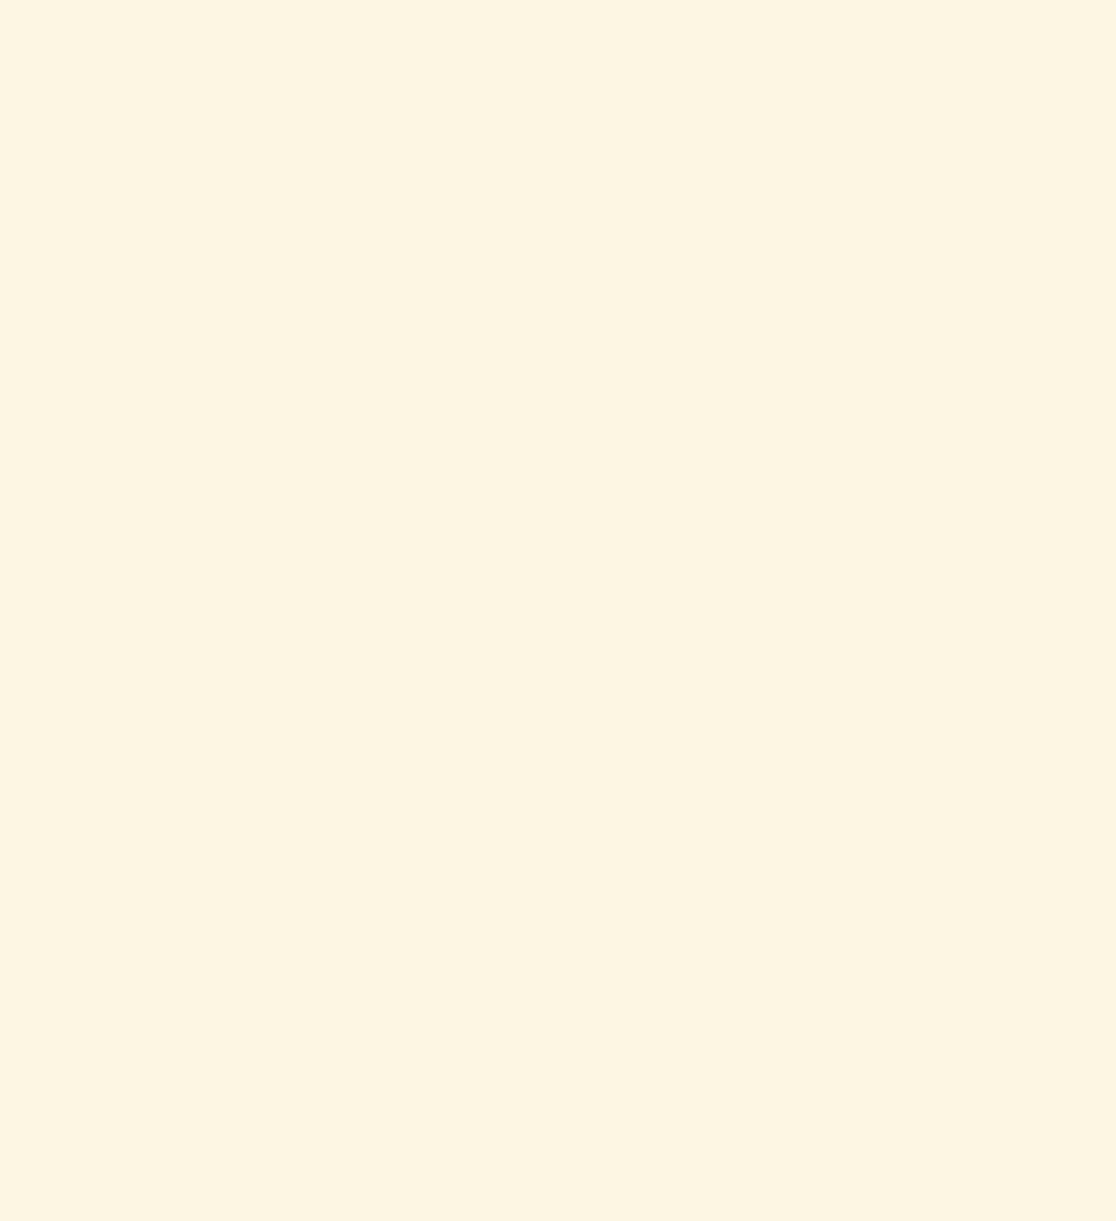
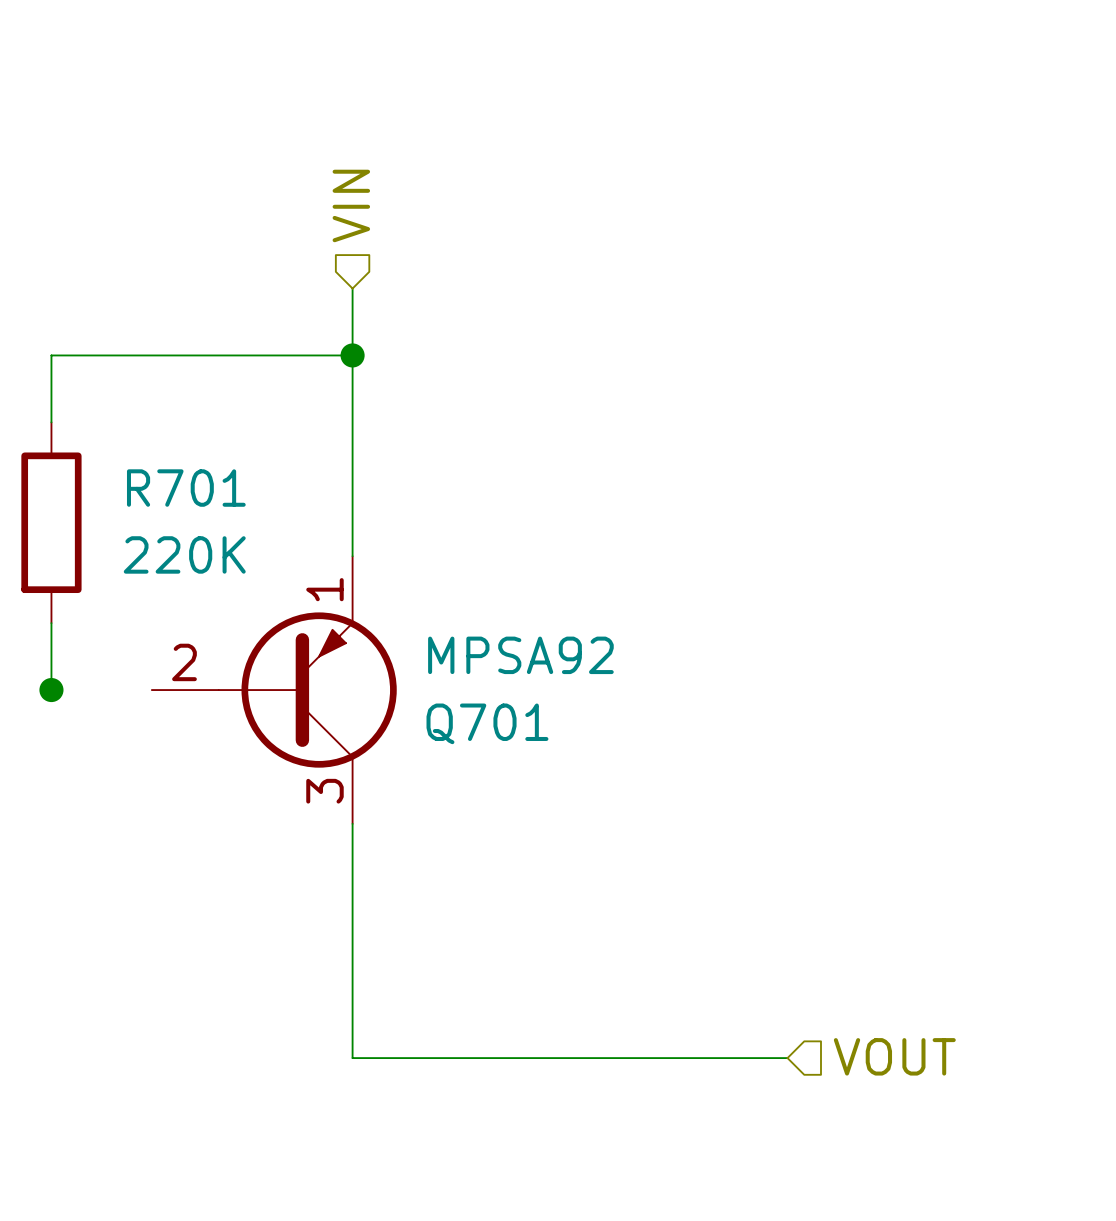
hierarchical label: none -> VIN (351, 205)
wire: none -> (352, 288) (352, 556)
wire: none -> (352, 355) (51, 355) (51, 422)
junction: none -> (352, 355)
R701: none -> 220K (51, 522)
wire: none -> (51, 623) (51, 690)
junction: none -> (51, 690)
Q701: none -> MPSA92 (274, 690)
wire: none -> (352, 823) (352, 1058) (787, 1058)
hierarchical label: none -> VOUT (894, 1056)

